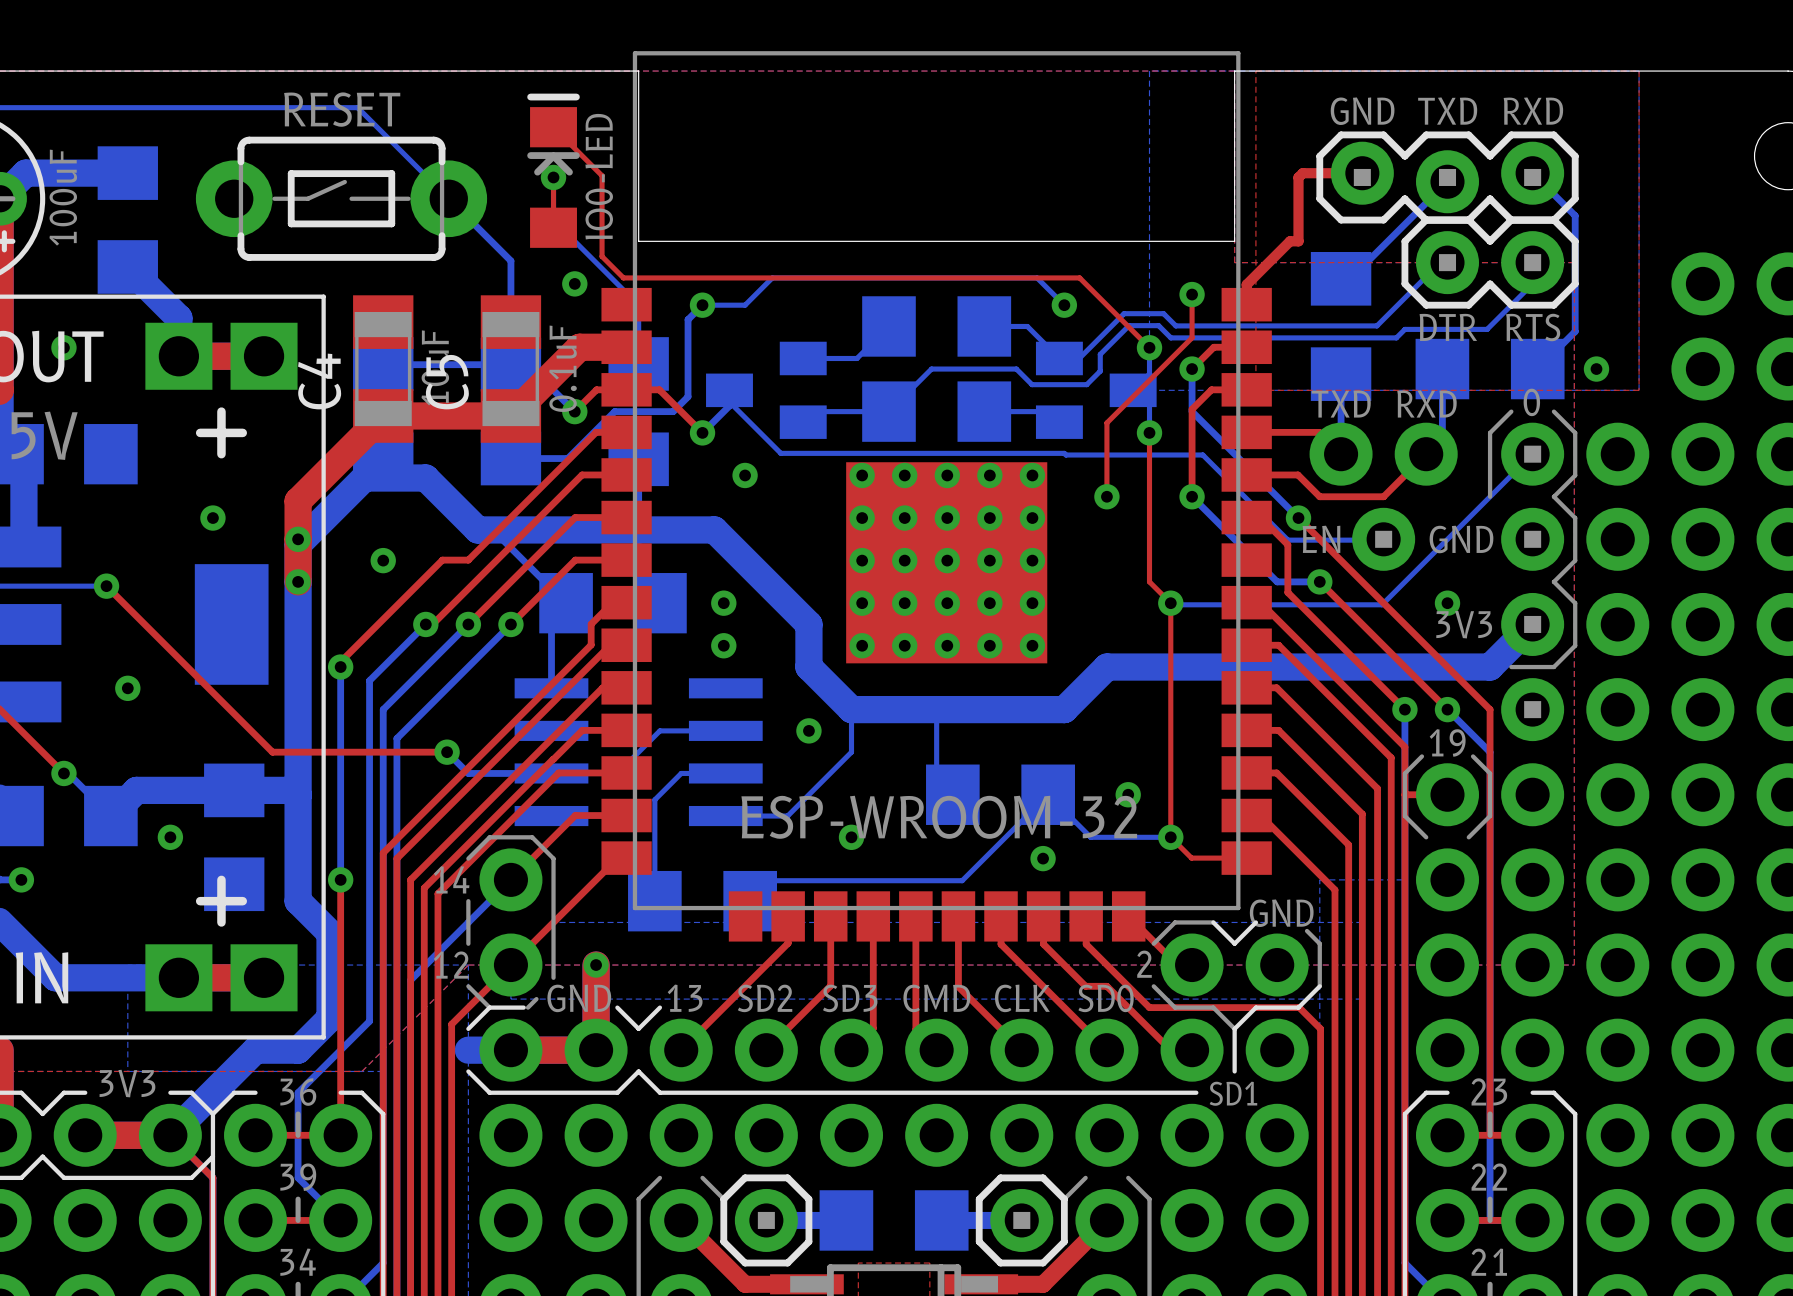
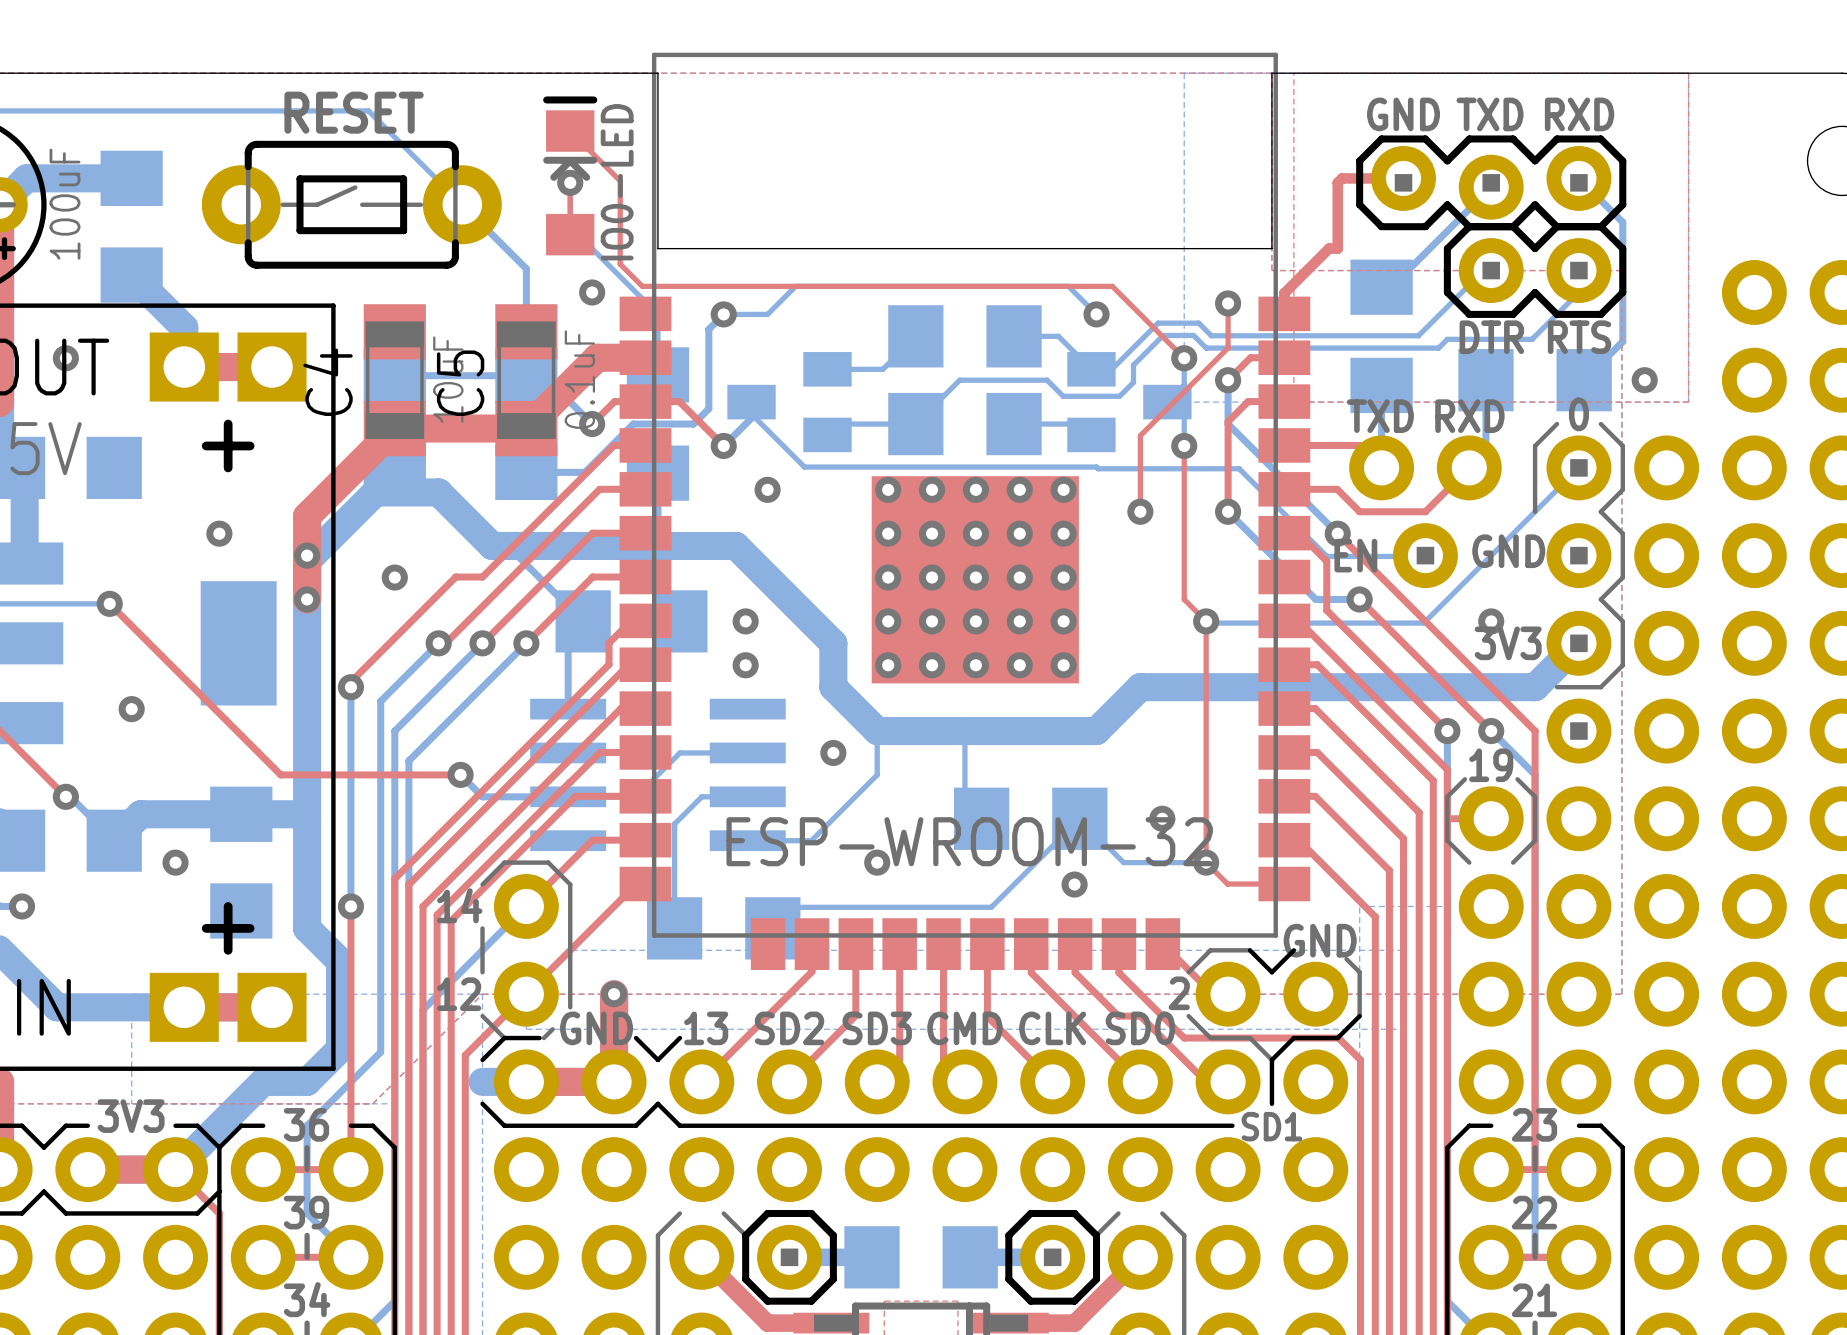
text position: GND (1461, 539) -> GND (1508, 551)

